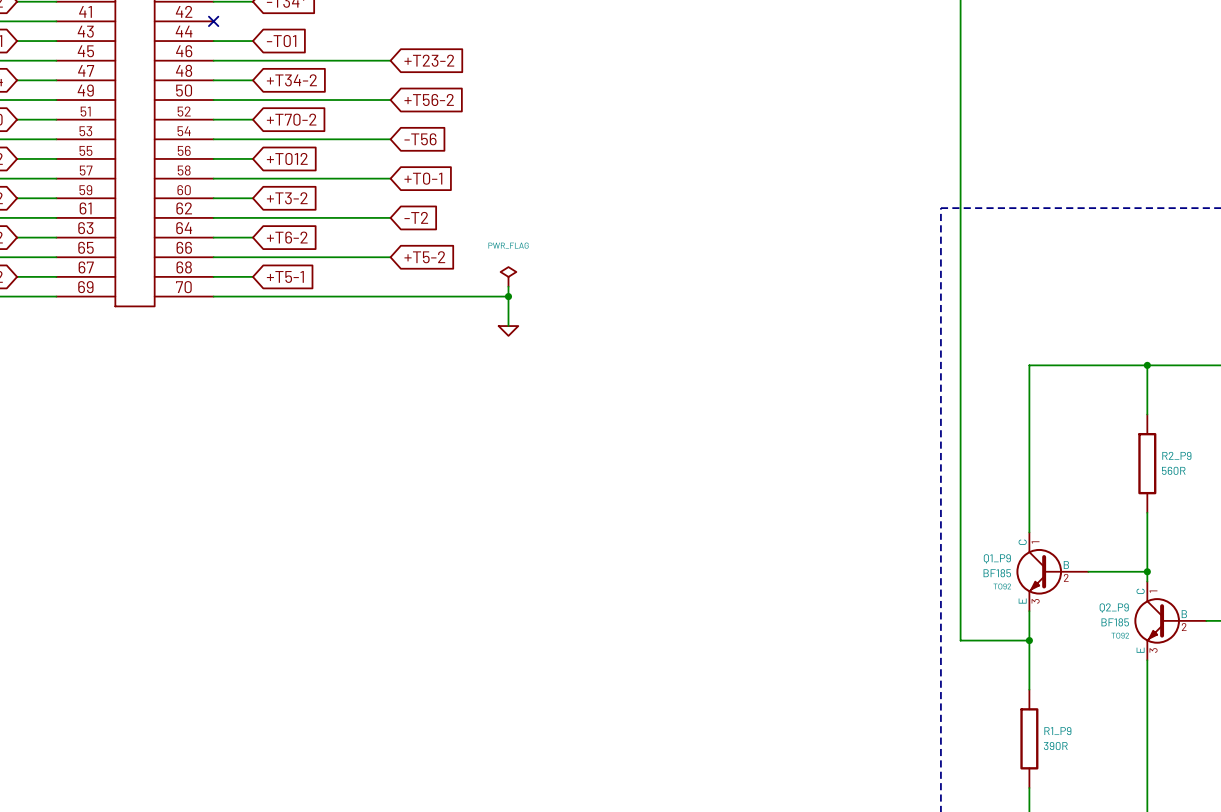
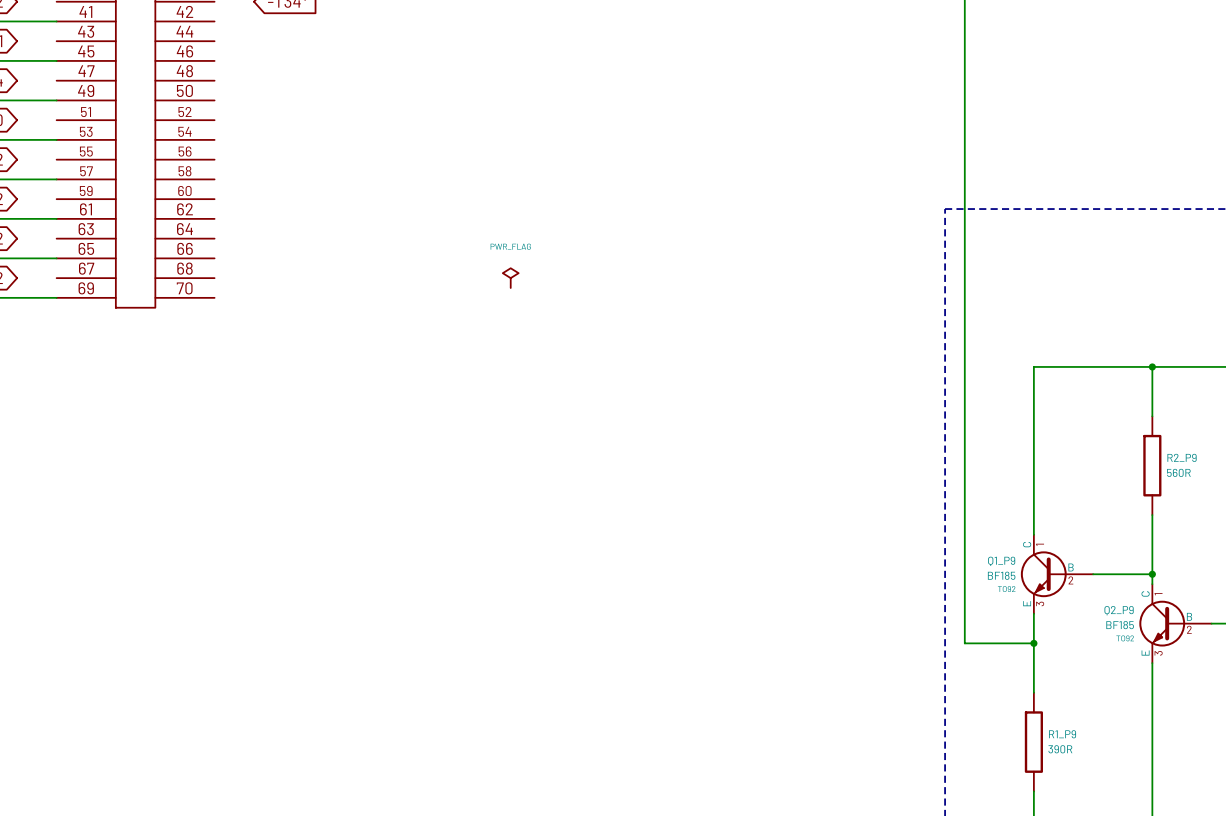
wire: (17, 1) (56, 1) -> none
wire: (213, 1) (252, 1) -> none
no-connect mark: (213, 21) -> none
wire: (17, 41) (56, 41) -> none
wire: (213, 41) (252, 41) -> none
global label: -T01 (281, 41) -> none
wire: (213, 60) (390, 60) -> none
global label: +T23-2 (429, 60) -> none
wire: (17, 80) (56, 80) -> none
wire: (213, 80) (252, 80) -> none
global label: +T34-2 (291, 80) -> none
global label: +T56-2 (429, 99) -> none
wire: (213, 100) (390, 100) -> none
wire: (17, 119) (56, 119) -> none
wire: (213, 119) (252, 119) -> none
global label: +T70-2 (291, 119) -> none
wire: (213, 139) (390, 139) -> none
global label: -T56 (420, 139) -> none
wire: (17, 158) (56, 158) -> none
wire: (213, 158) (252, 158) -> none
global label: +T012 (287, 158) -> none
wire: (213, 178) (390, 178) -> none
global label: +T0-1 (423, 178) -> none
wire: (17, 198) (56, 198) -> none
wire: (213, 198) (252, 198) -> none
global label: +T3-2 (287, 198) -> none
wire: (213, 217) (390, 217) -> none
global label: -T2 (416, 217) -> none
wire: (17, 237) (56, 237) -> none
wire: (213, 237) (252, 237) -> none
global label: +T6-2 (287, 237) -> none
wire: (213, 257) (390, 257) -> none
global label: +T5-2 (424, 257) -> none
wire: (17, 276) (56, 276) -> none
wire: (213, 276) (252, 276) -> none
global label: +T5-1 (285, 276) -> none
wire: (508, 286) (508, 326) -> none
wire: (213, 296) (508, 296) -> none
junction: (508, 296) -> none
power symbol: (508, 330) -> none

